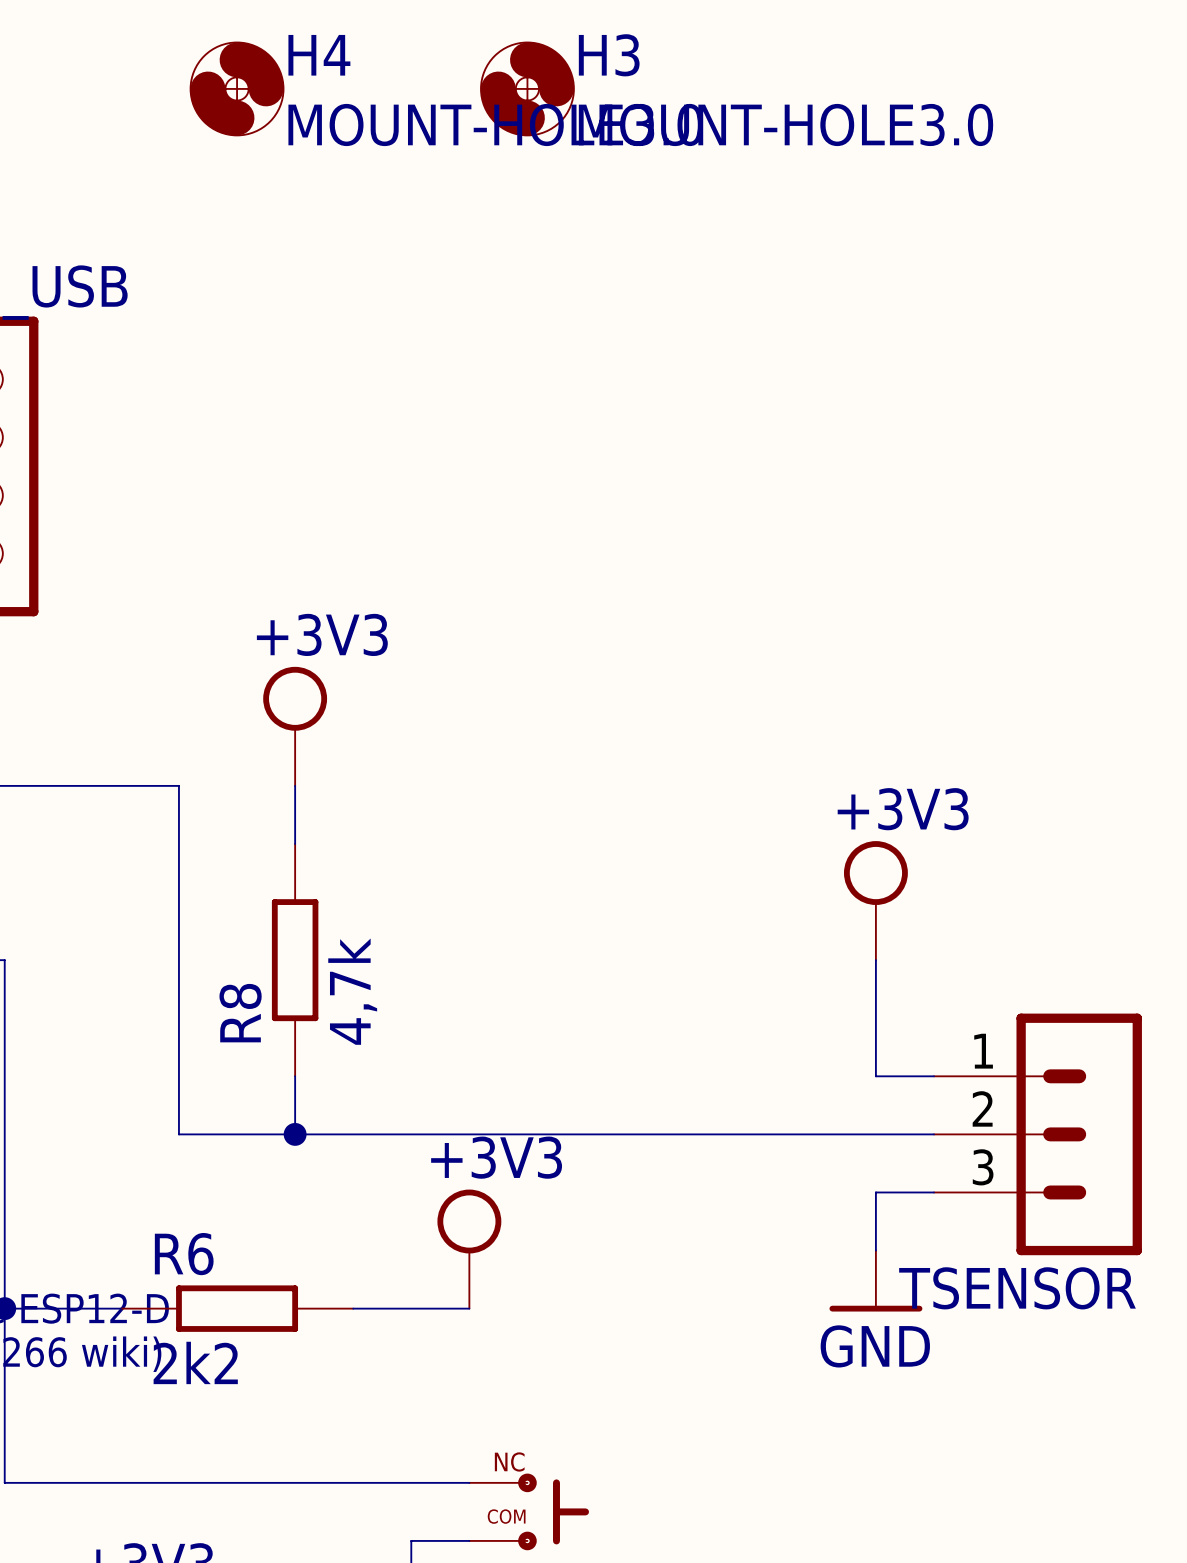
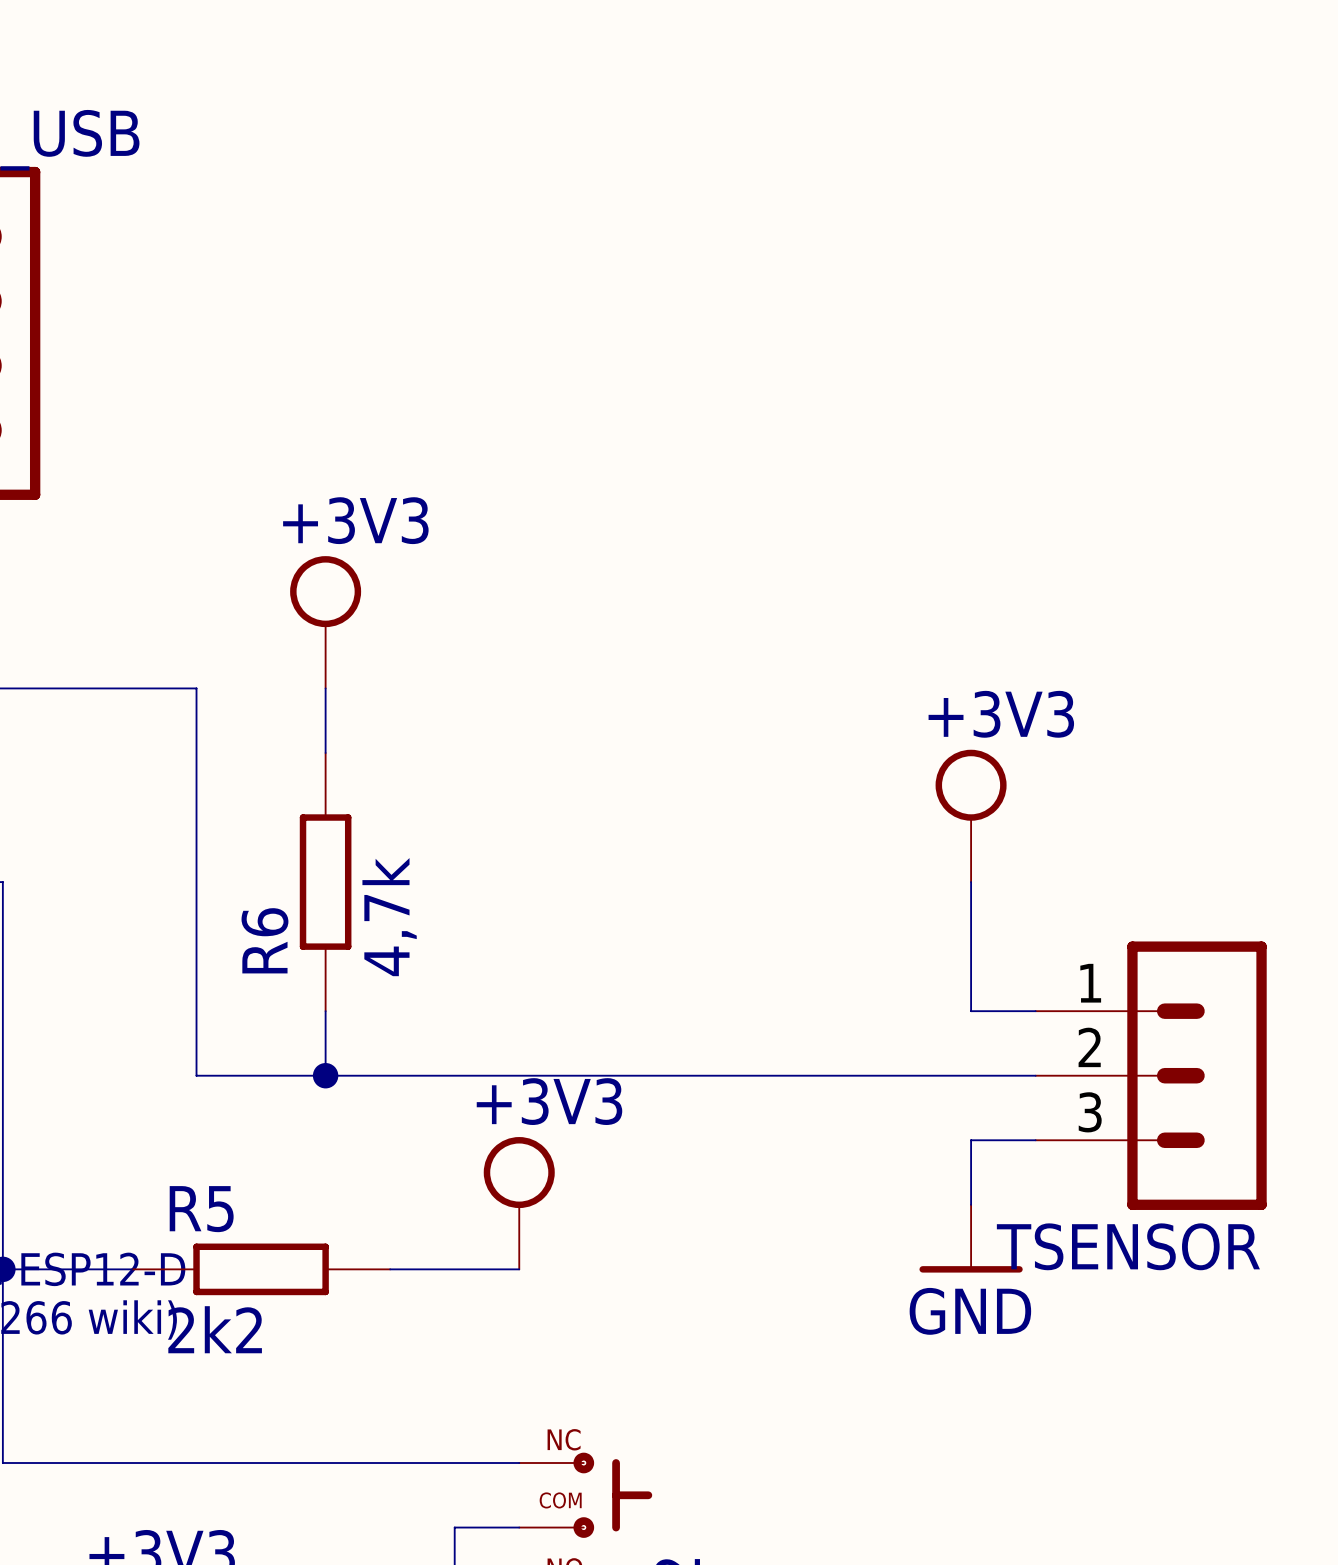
R8 name: R8 (240, 1013) -> R6 (264, 940)
R6 name: R6 (184, 1254) -> R5 (201, 1209)

